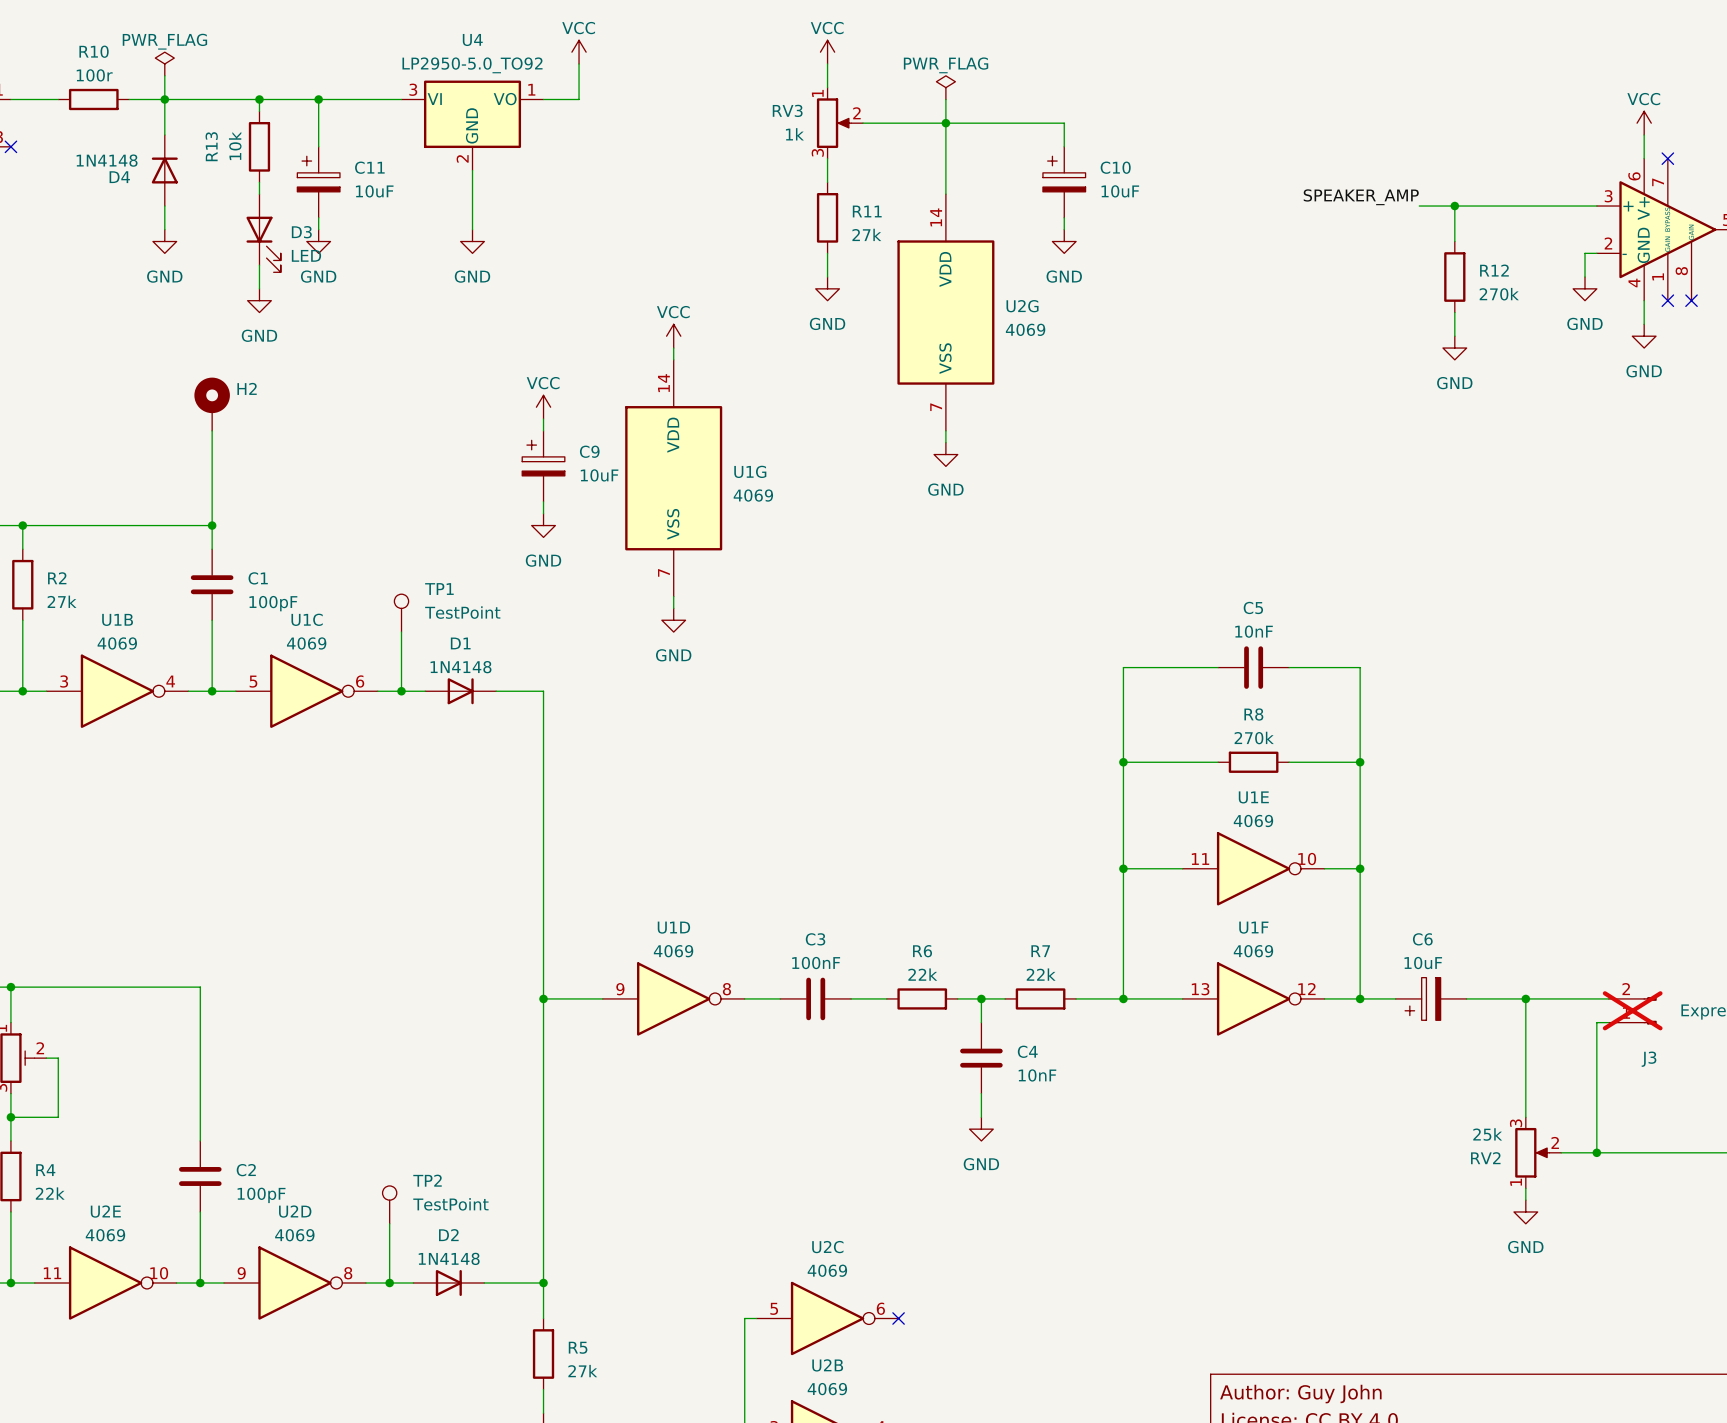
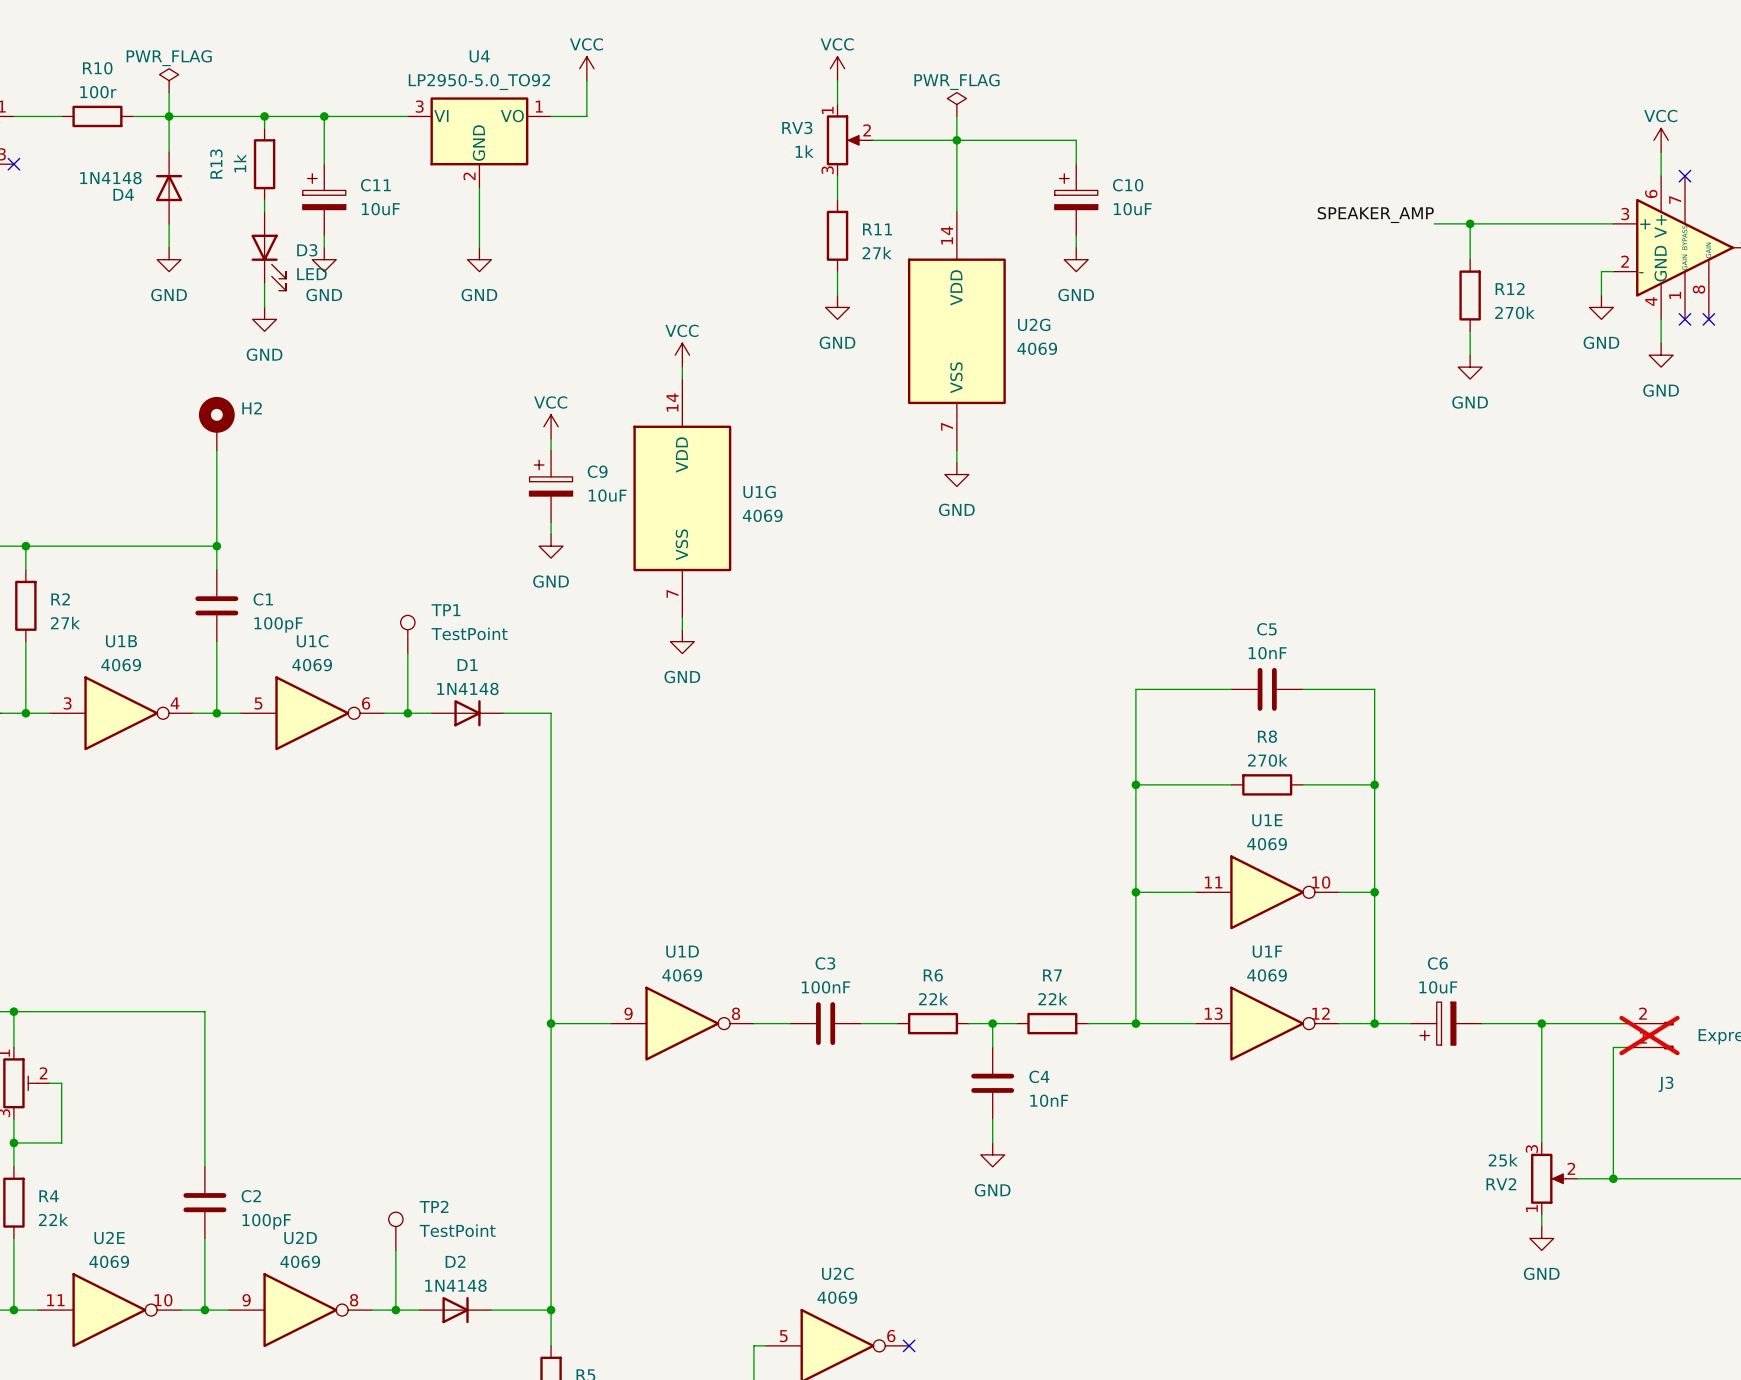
R13 value: 10k (235, 145) -> 1k (240, 163)

